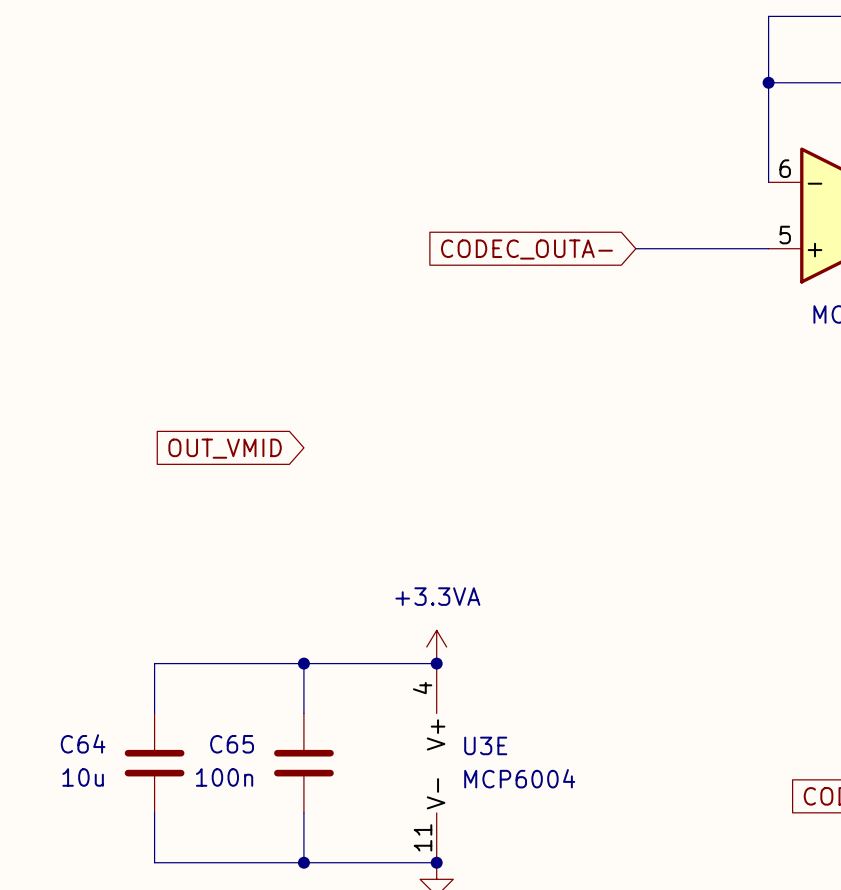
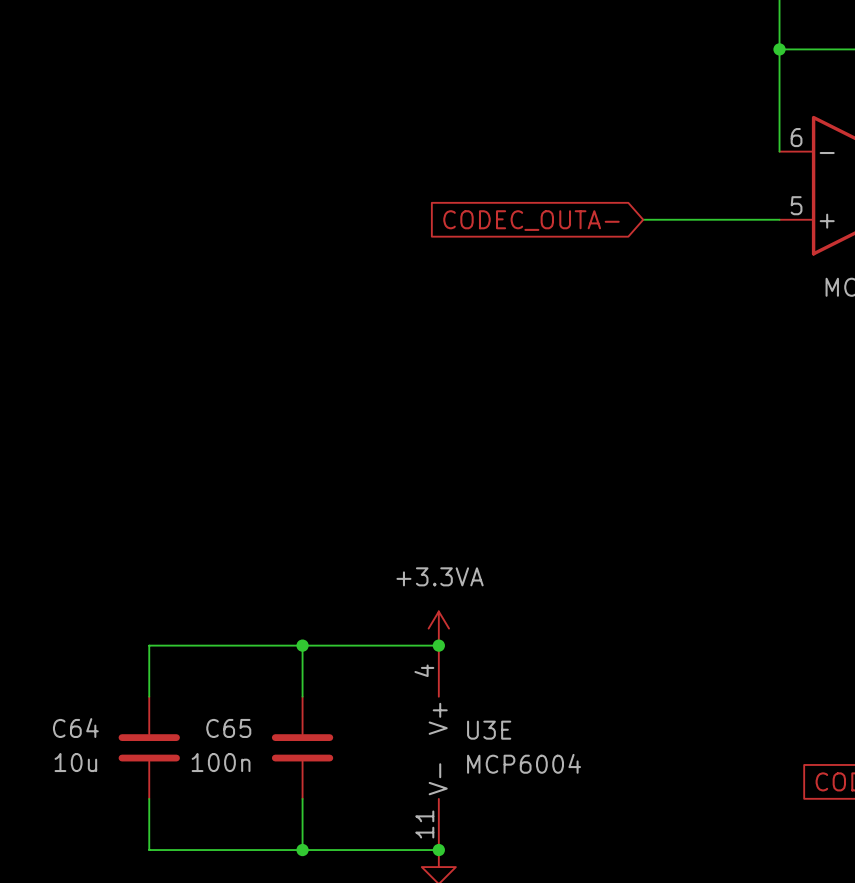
global label: OUT_VMID (225, 448) -> none

